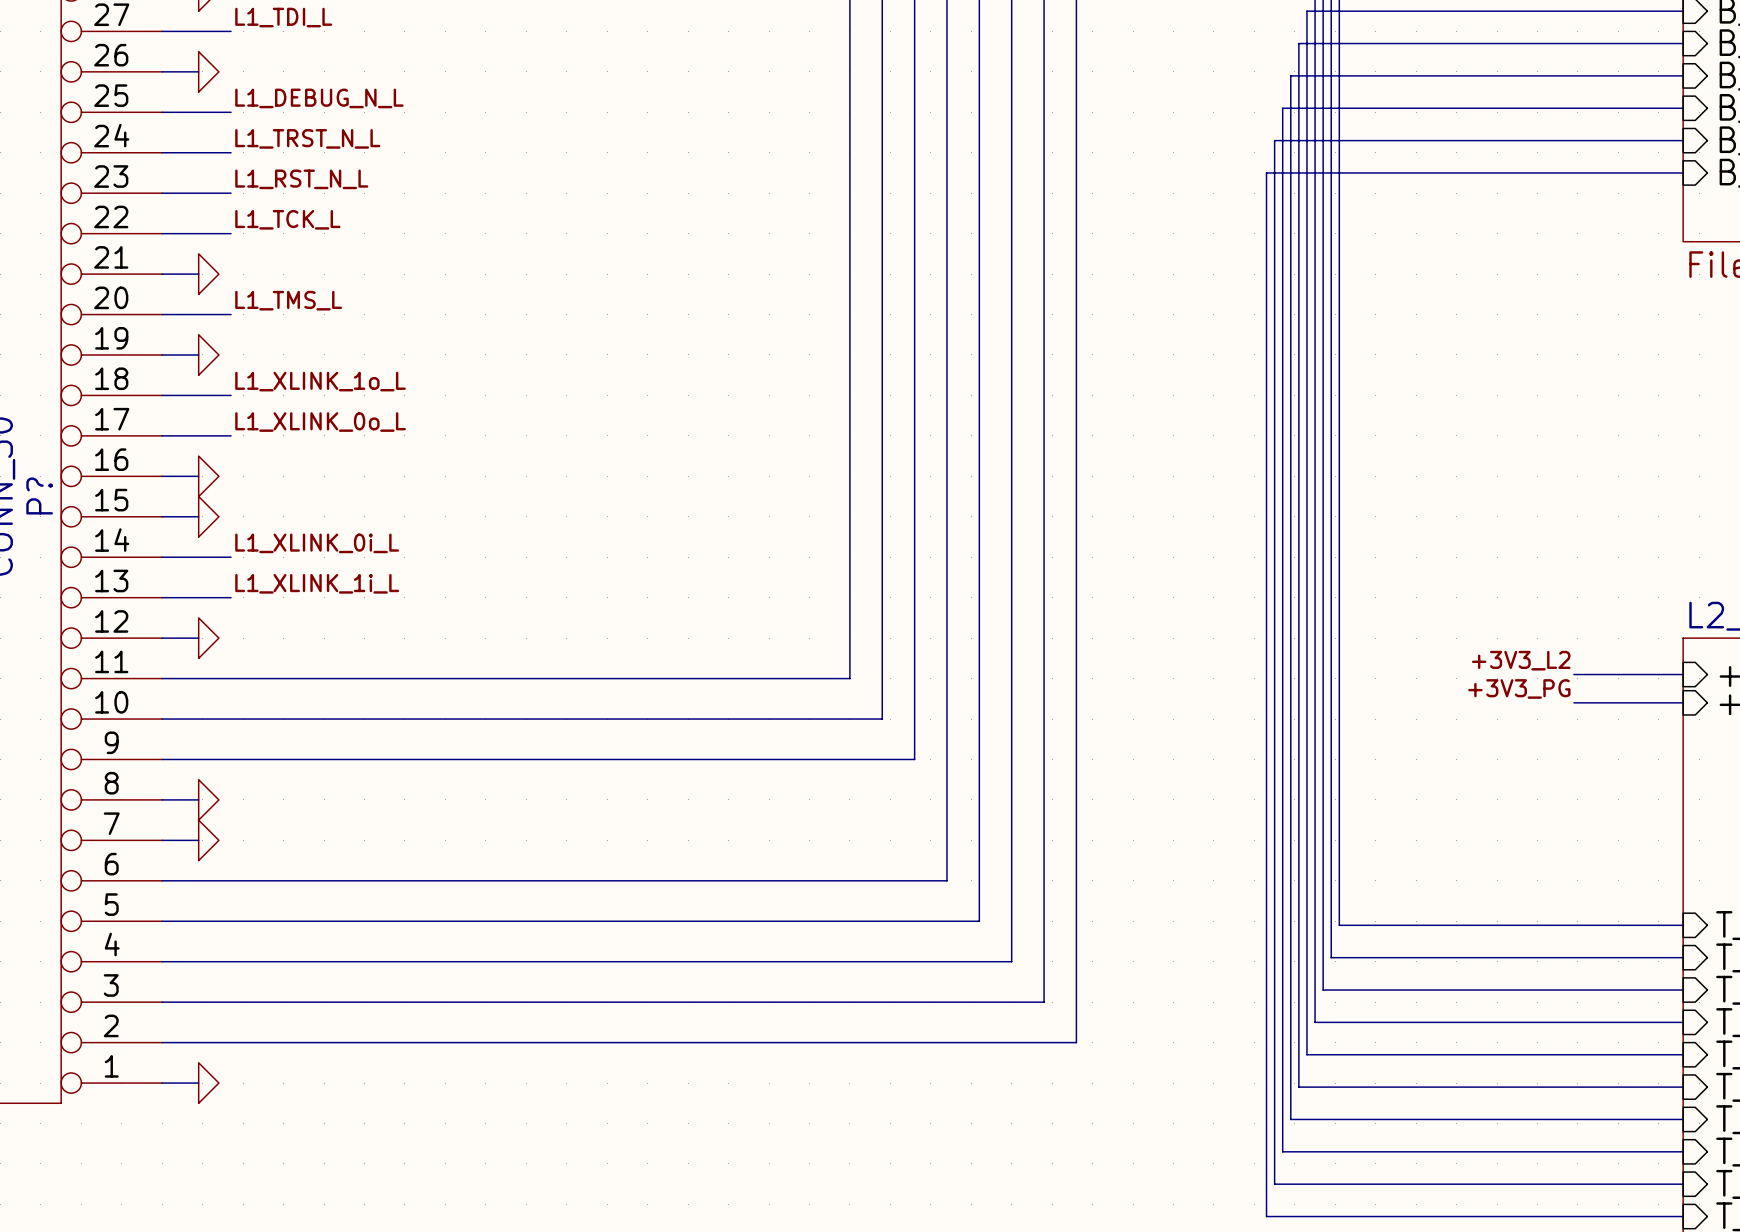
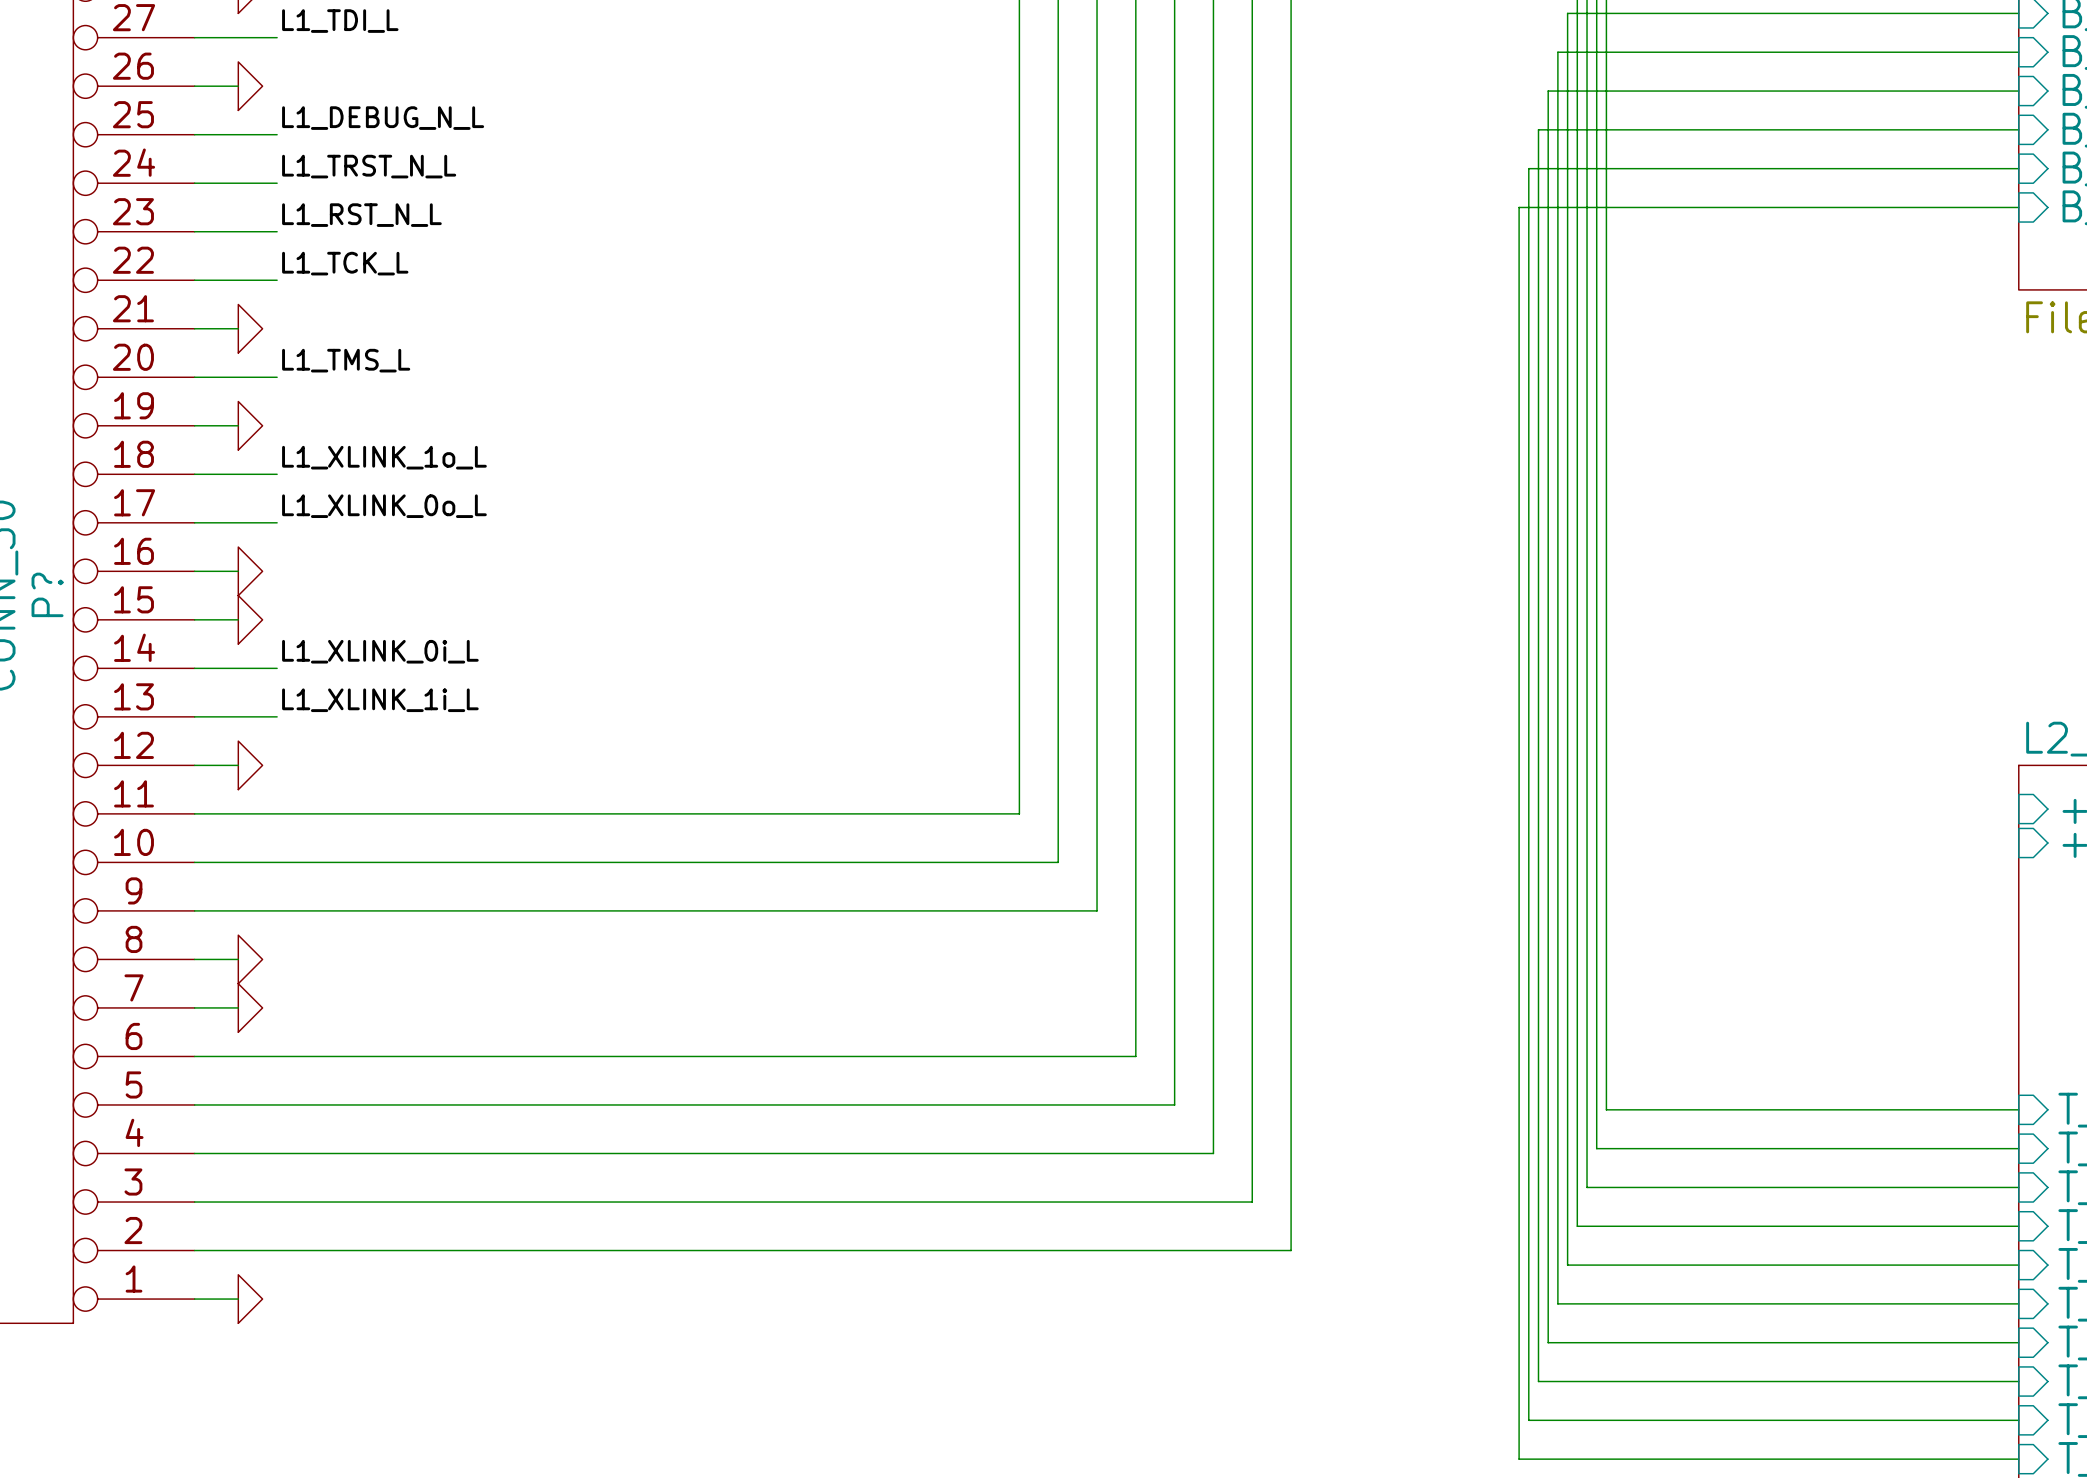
label: +3V3_L2 (1521, 660) -> none
wire: (1573, 674) (1683, 674) -> none
label: +3V3_PG (1519, 688) -> none
wire: (1573, 702) (1683, 702) -> none

